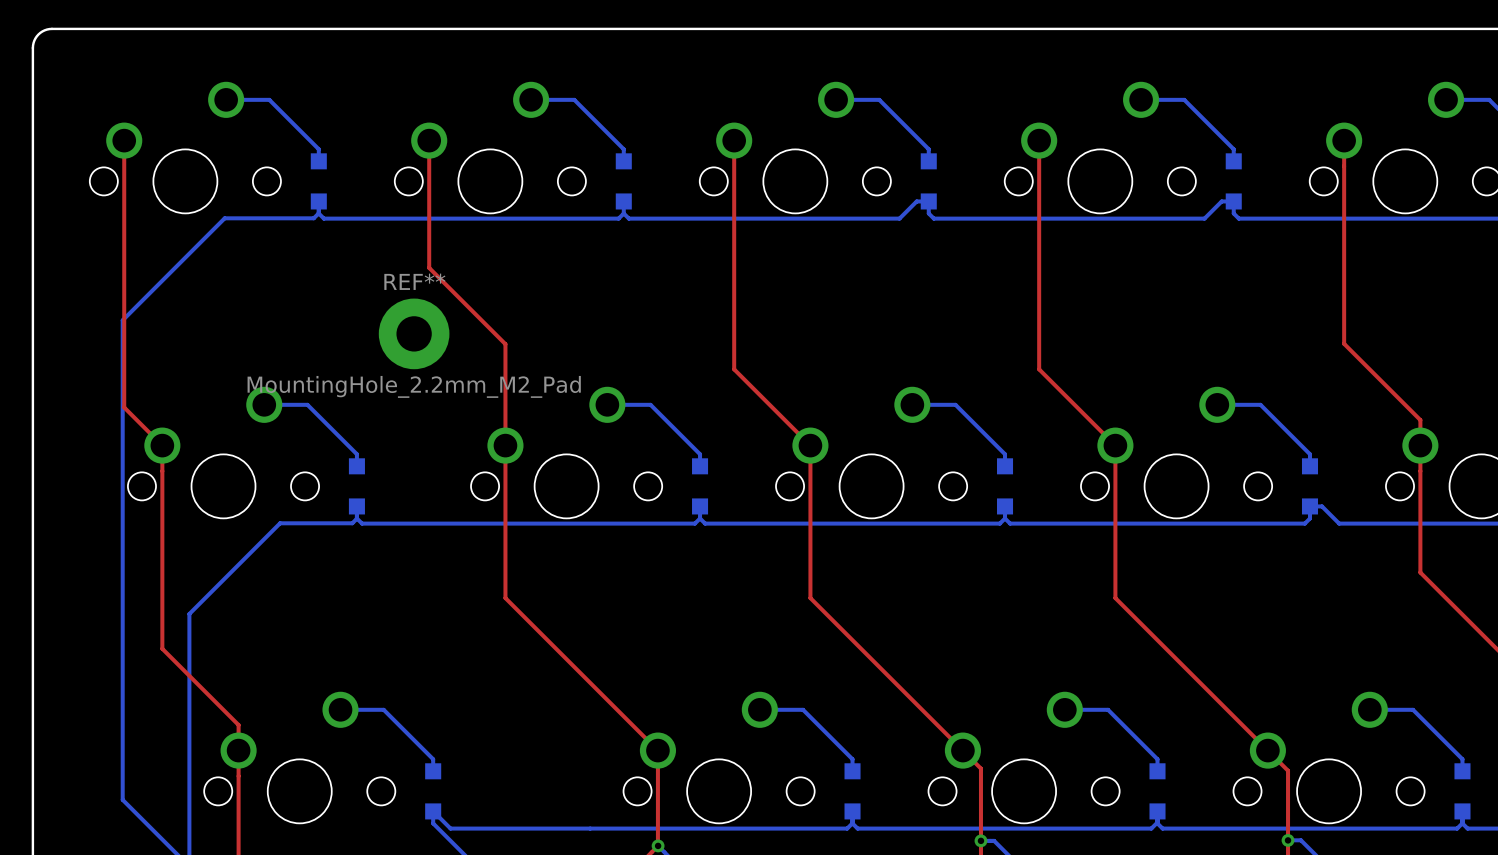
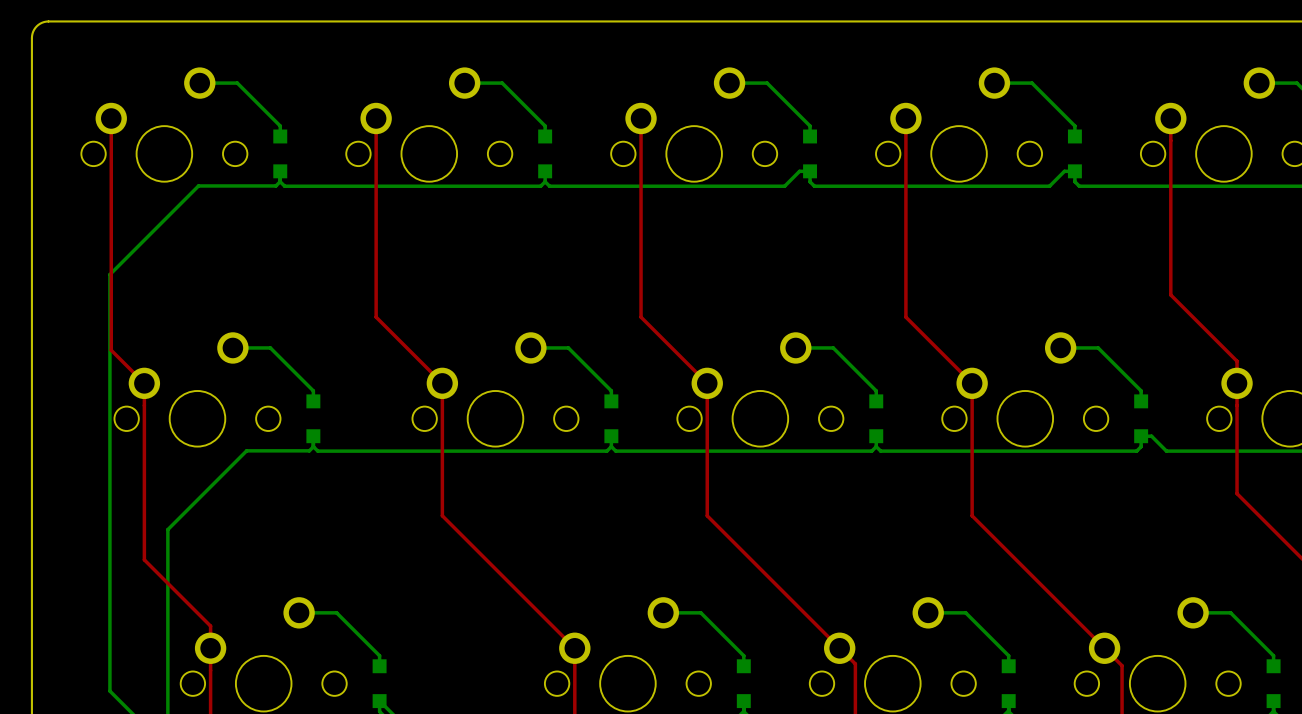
top track: (429, 267) (505, 344) (505, 445) -> (376, 229) (376, 317) (442, 383)
REF**: MountingHole_2.2mm_M2_Pad (414, 333) -> none

